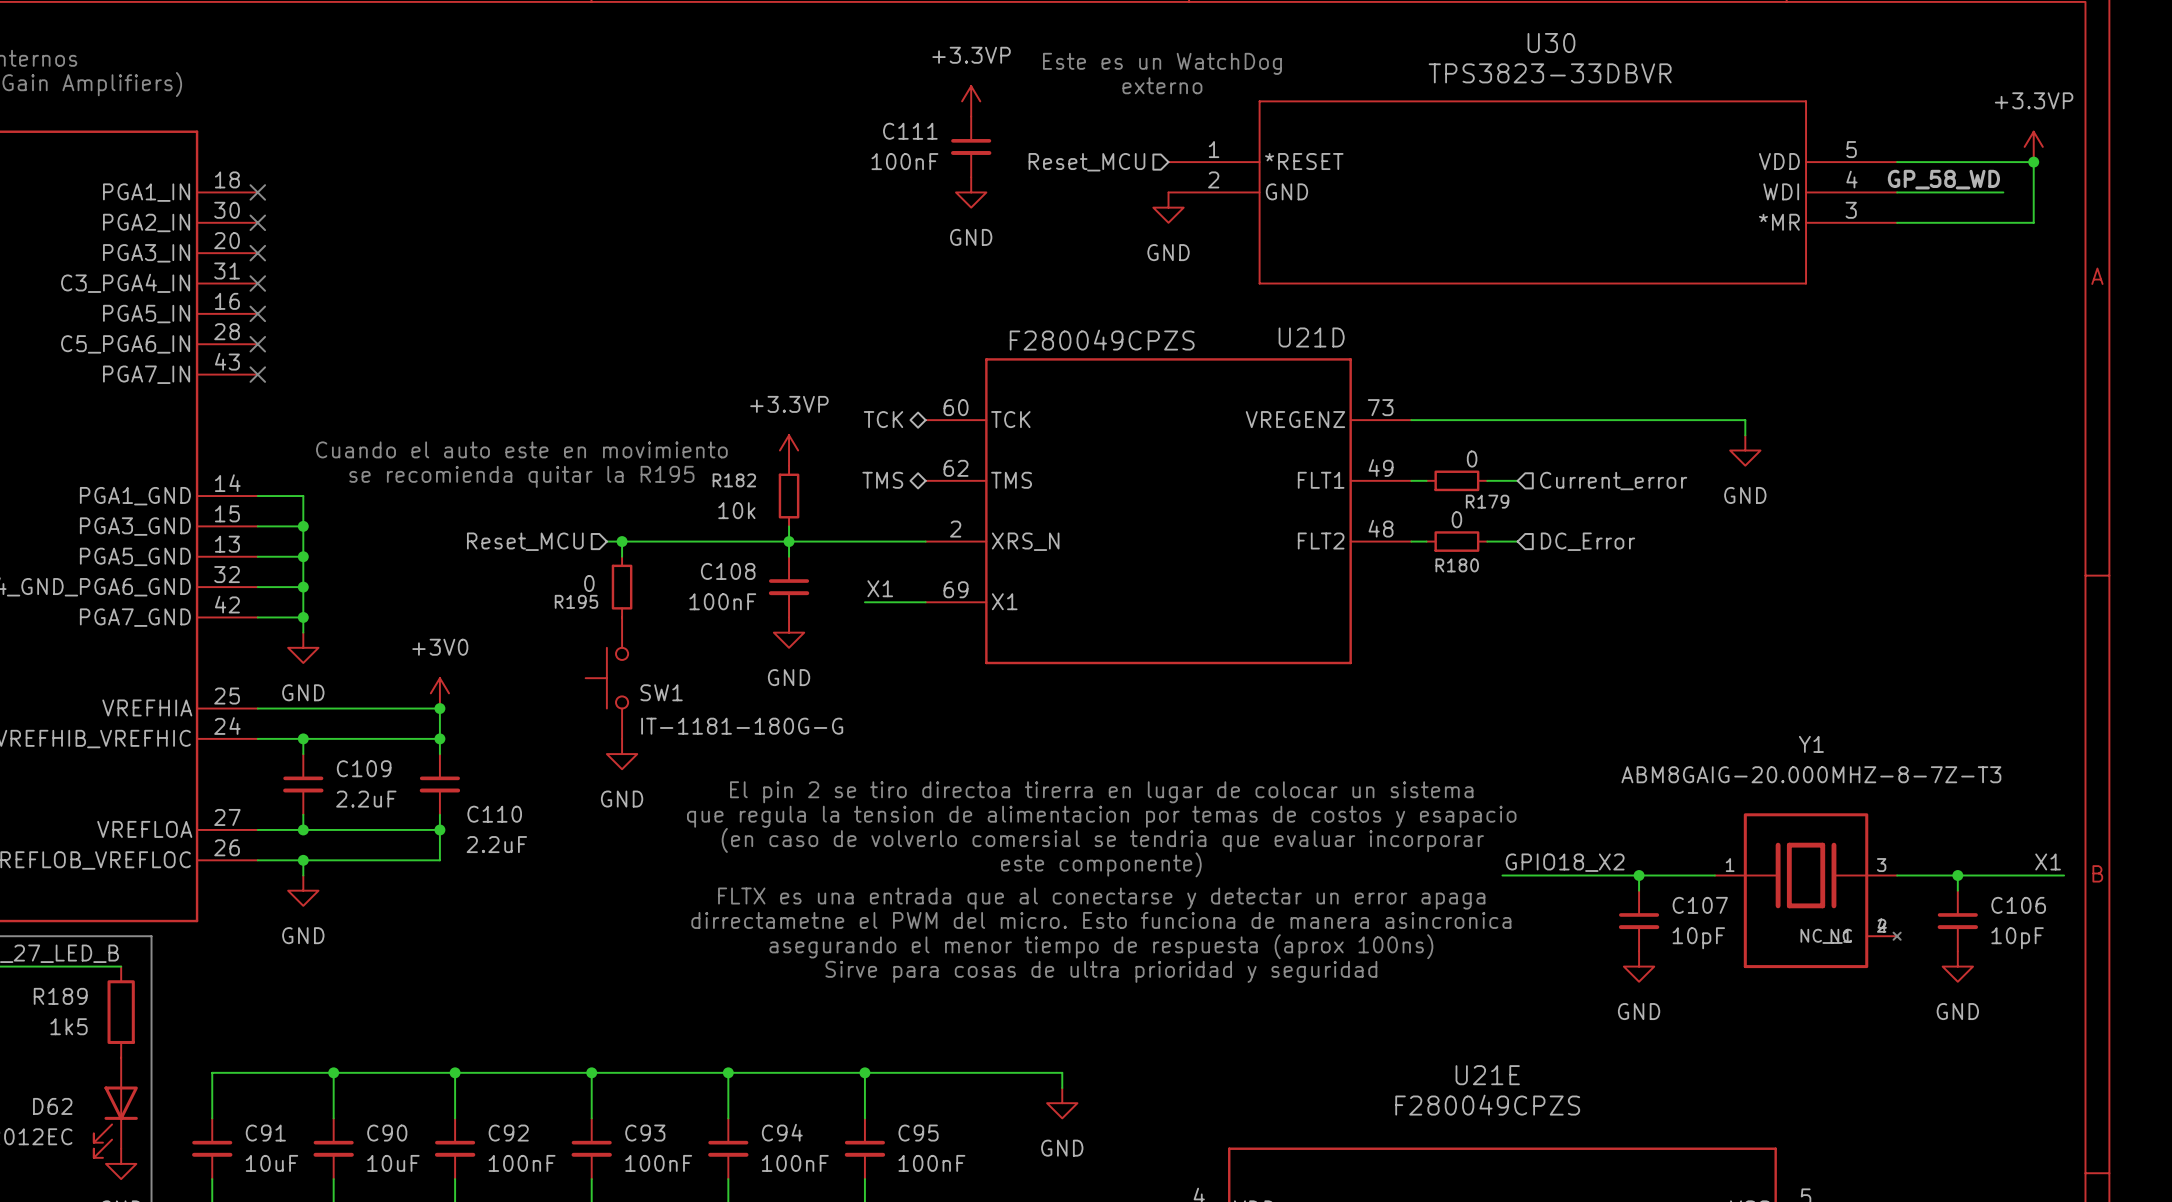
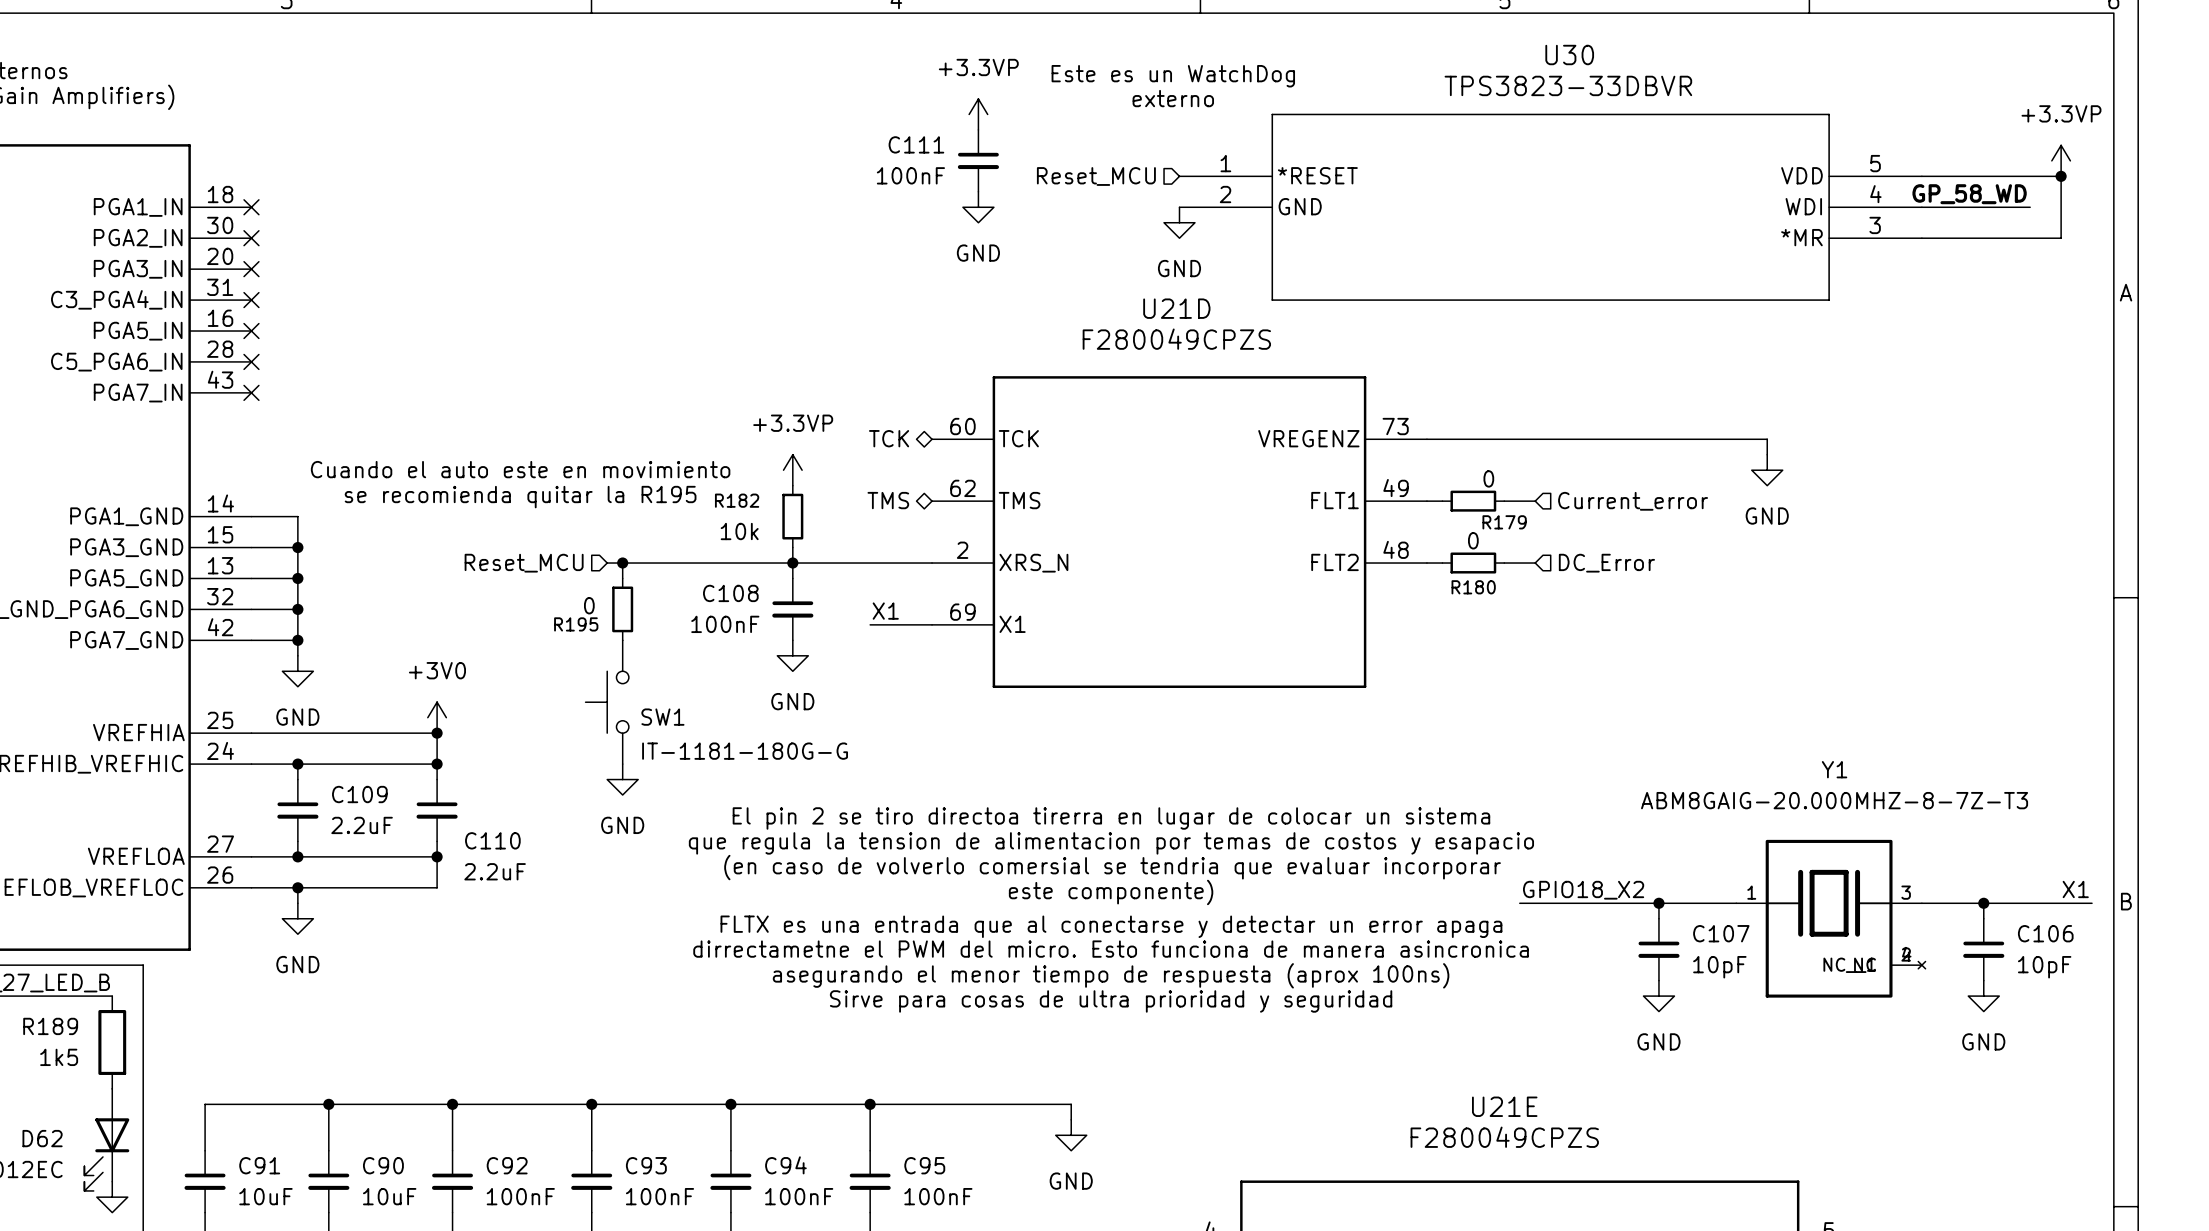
U21D name position: U21D (1311, 337) -> U21D (1176, 308)
U21D value position: F280049CPZS (1102, 340) -> F280049CPZS (1176, 339)

